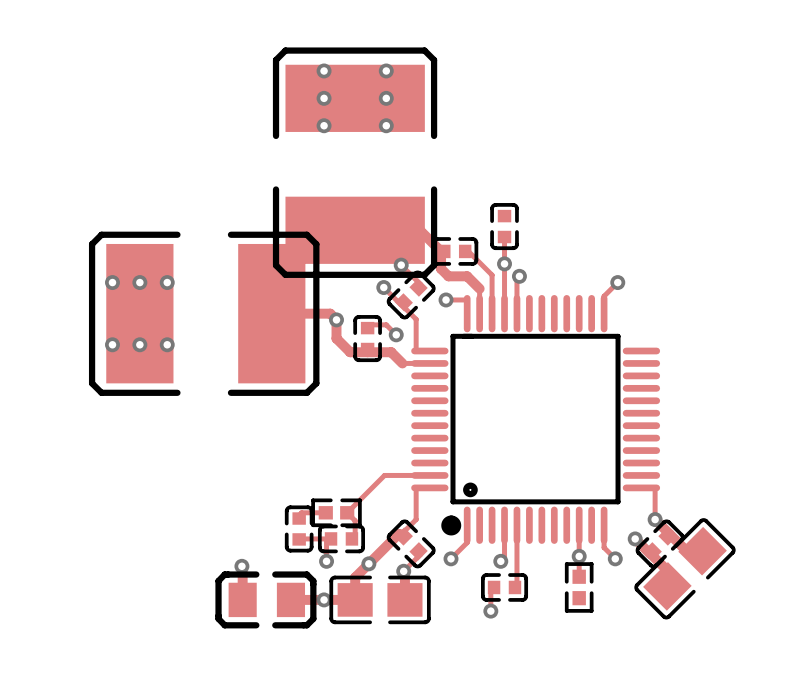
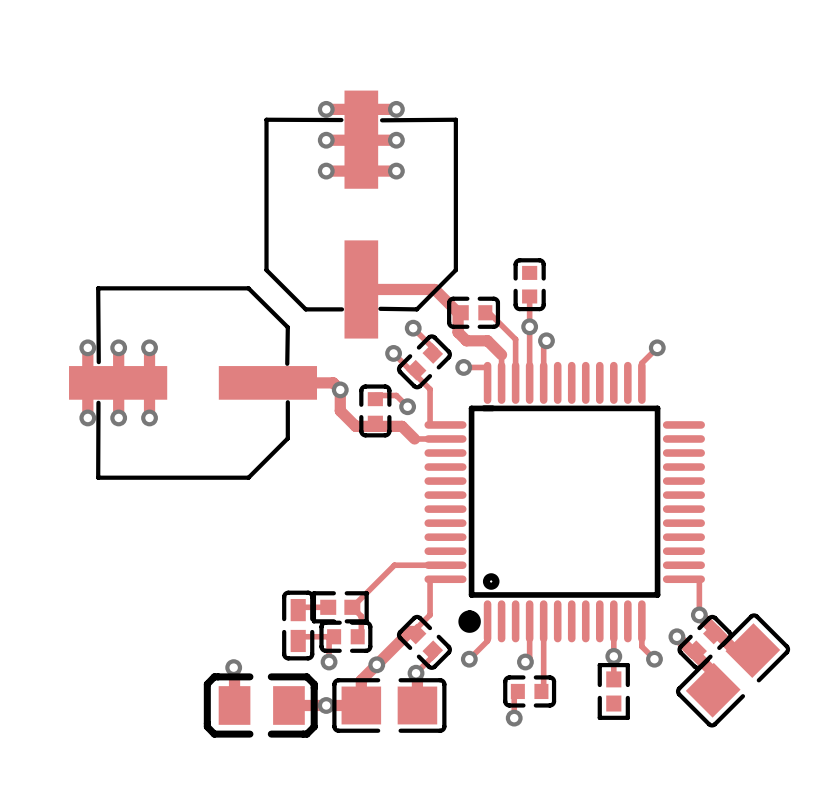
part footprint: [272, 47, 438, 278] -> [264, 90, 458, 339]
part footprint: [88, 231, 320, 396] -> [69, 286, 318, 480]
part footprint: [284, 505, 314, 553] -> [282, 590, 315, 661]

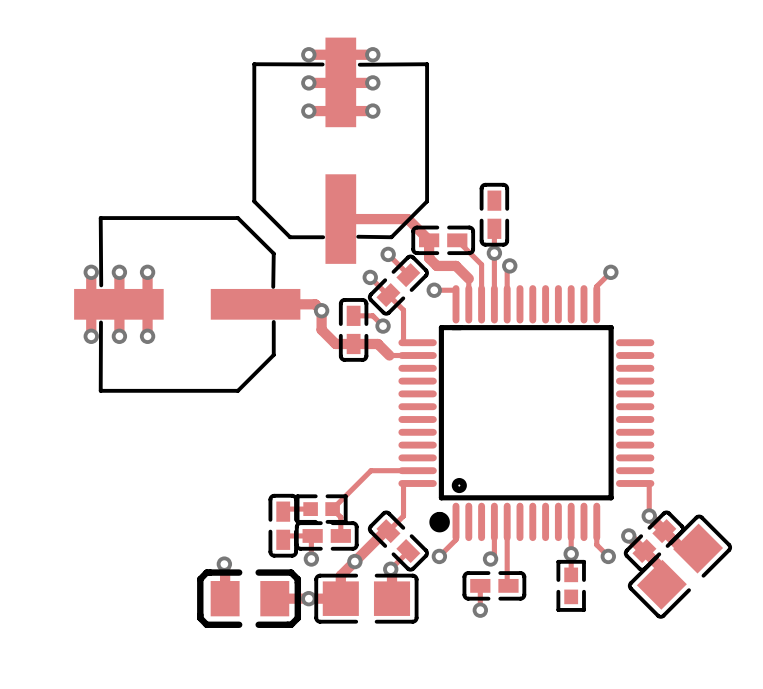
part footprint: [513, 258, 546, 312] -> [479, 182, 510, 247]
part footprint: [447, 296, 501, 329] -> [411, 225, 476, 256]
part footprint: [396, 334, 452, 390] -> [367, 254, 429, 316]
part footprint: [359, 384, 392, 438] -> [338, 298, 369, 362]
part footprint: [396, 614, 452, 670] -> [367, 510, 429, 572]
part footprint: [677, 614, 733, 670] -> [623, 510, 685, 572]
part footprint: [319, 620, 373, 653] -> [294, 521, 359, 551]
part footprint: [503, 675, 557, 708] -> [462, 571, 527, 601]

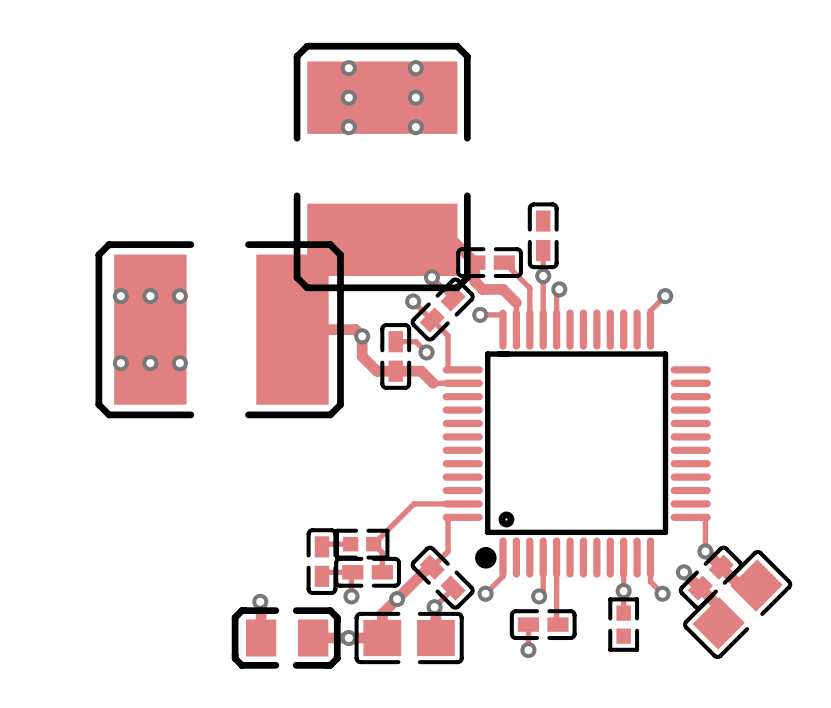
part footprint: [252, 37, 429, 264] -> [293, 42, 471, 292]
part footprint: [74, 216, 301, 393] -> [95, 241, 344, 419]

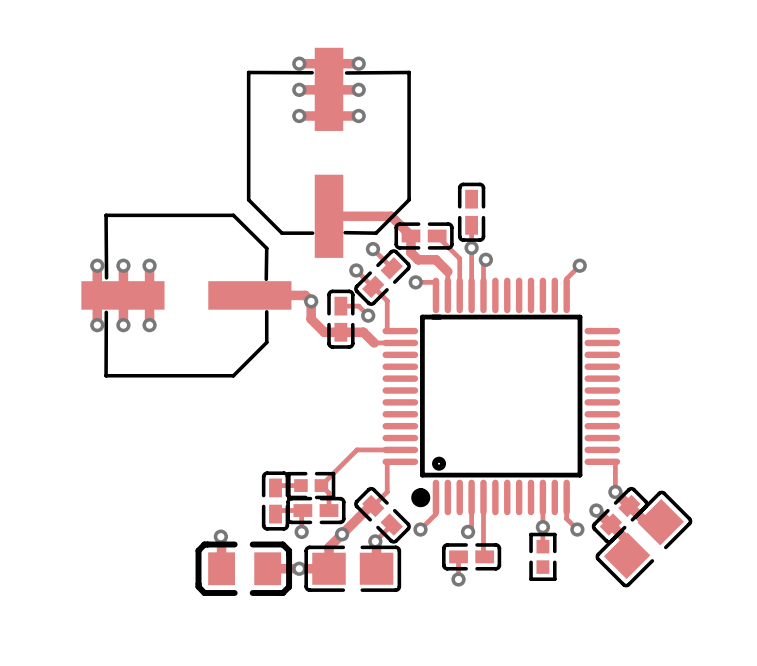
part footprint: [293, 42, 471, 292] -> [246, 47, 411, 258]
part footprint: [95, 241, 344, 419] -> [81, 213, 292, 378]

